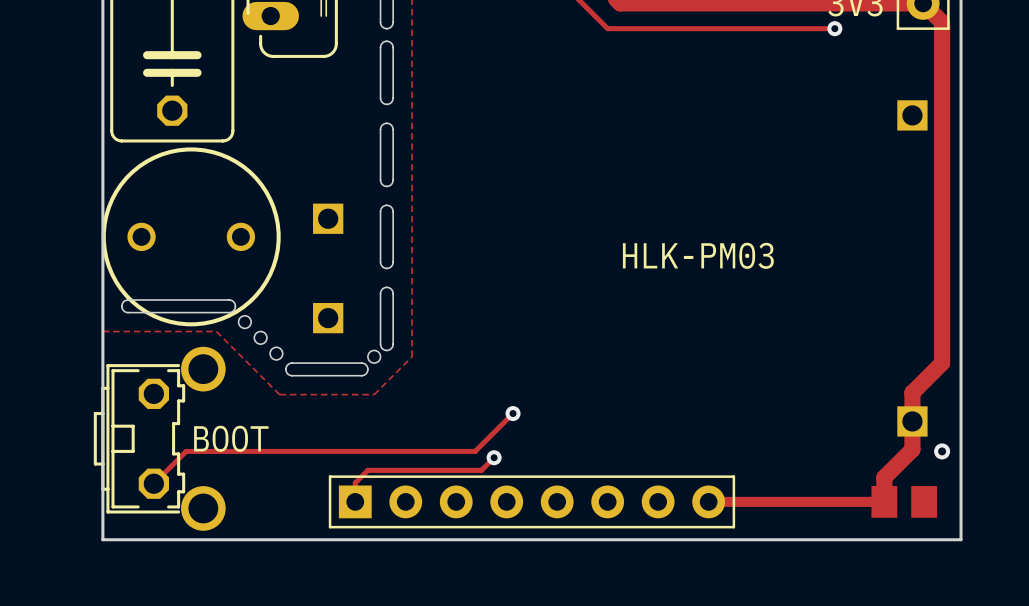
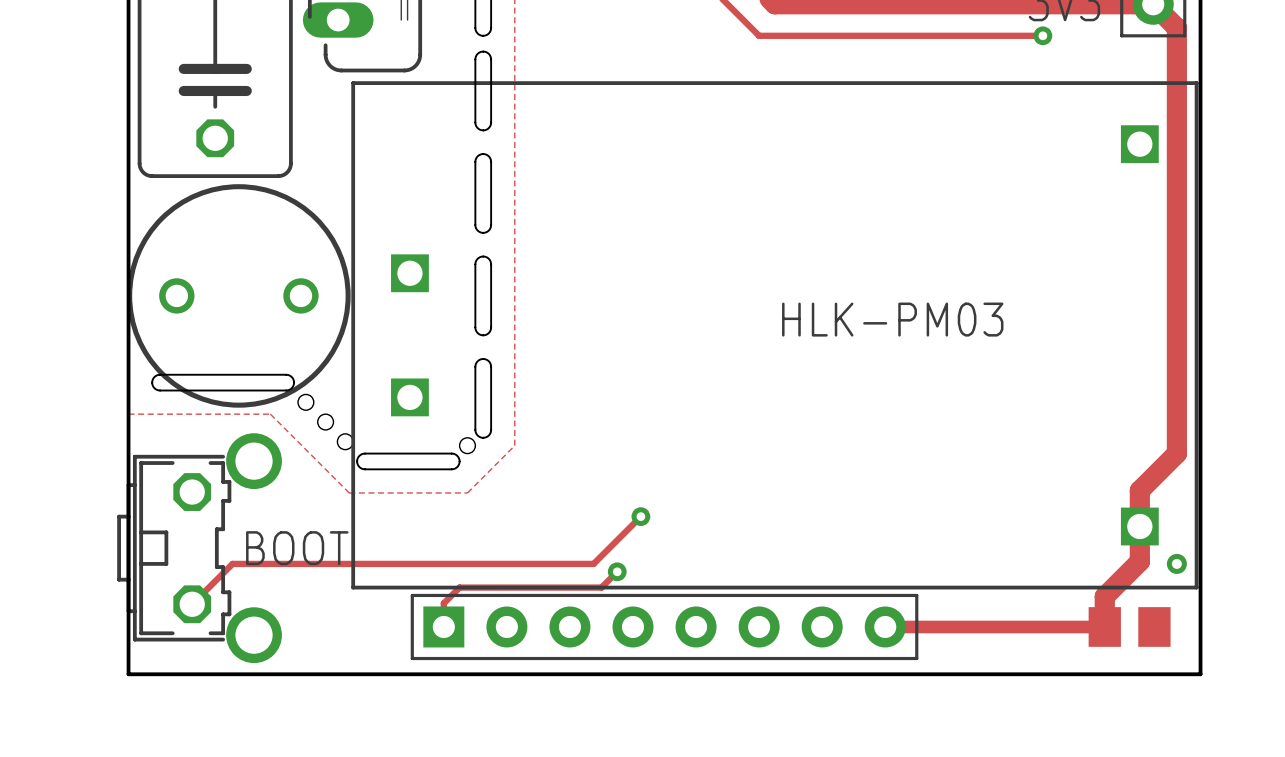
line: none -> (353, 83) (1196, 83) (1196, 587) (353, 587) (353, 83)

